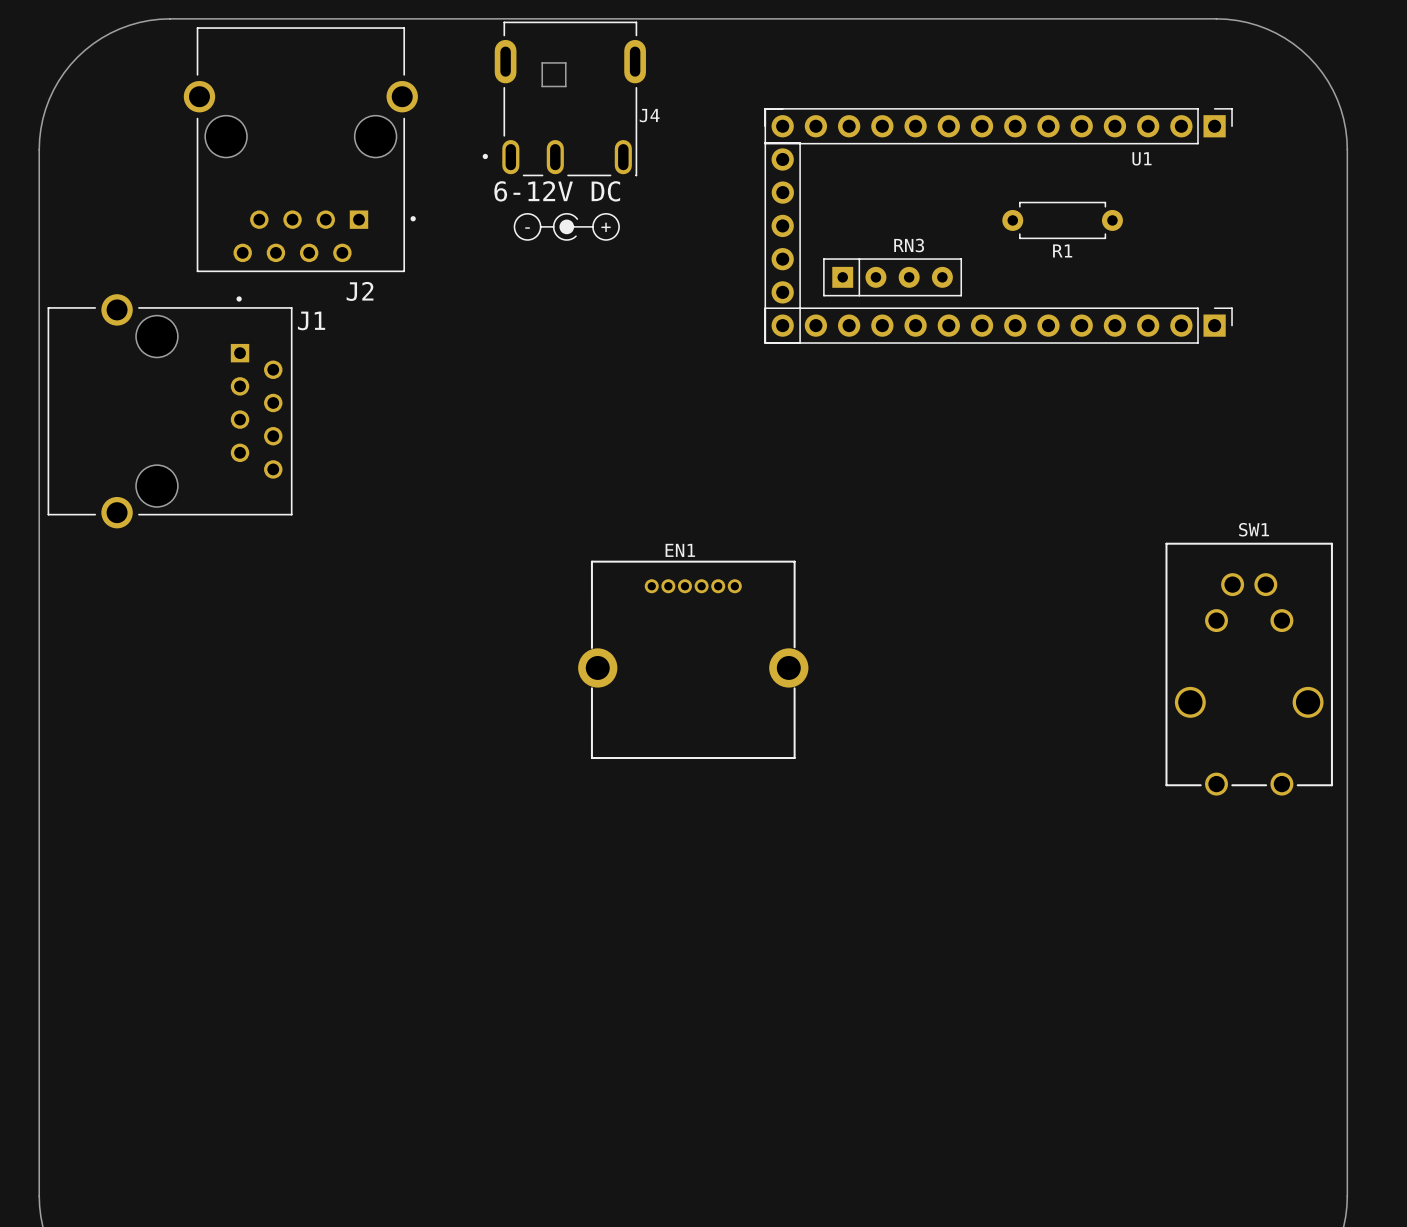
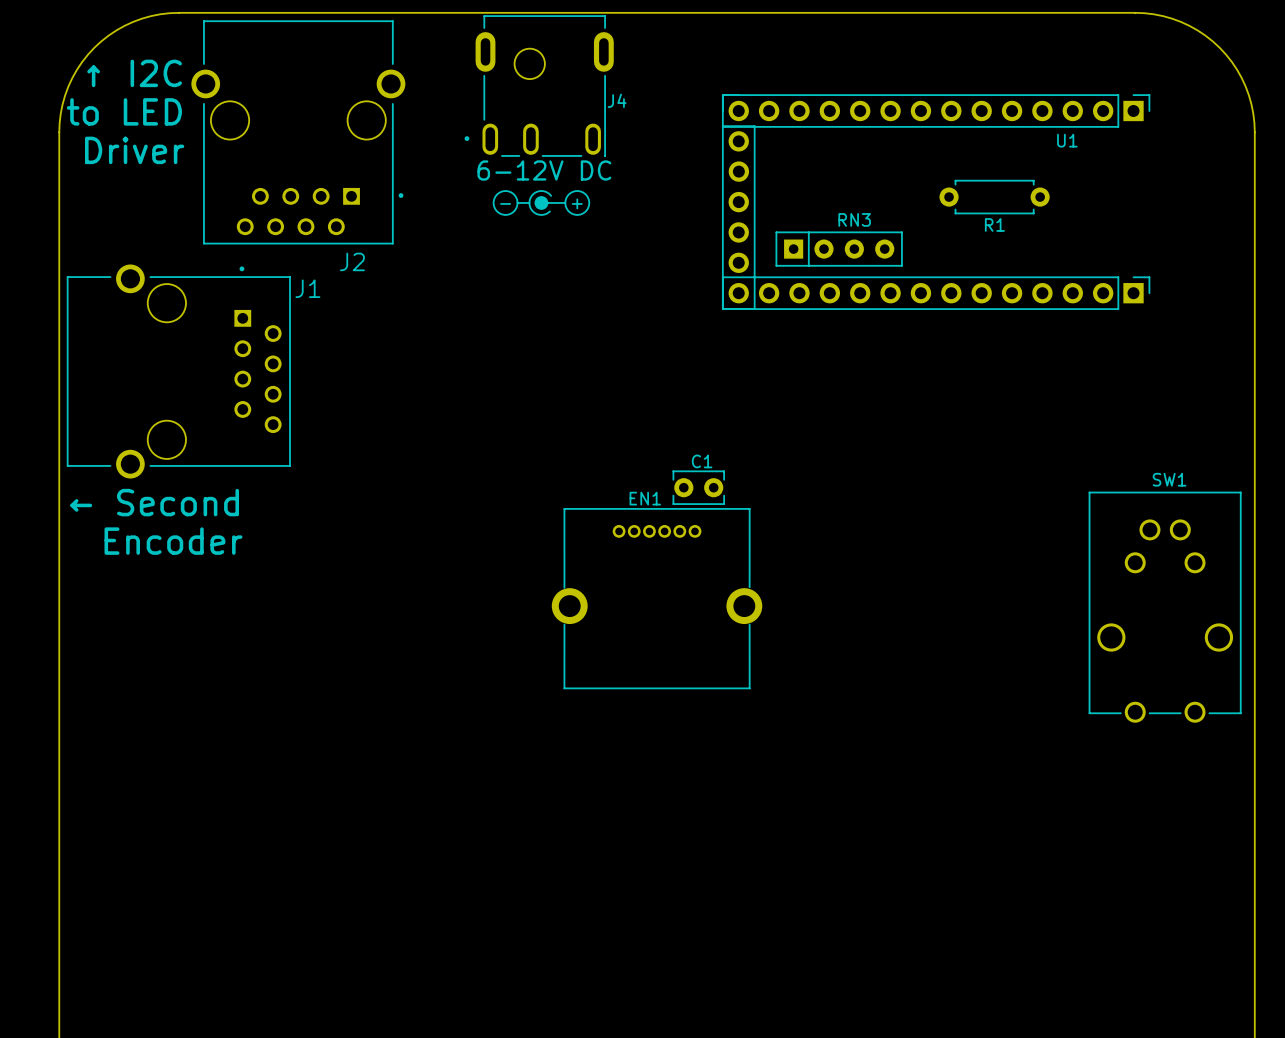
J4 footprint: [482, 21, 646, 177] -> [464, 15, 614, 157]
text: none -> ↑ I2C (134, 73)
text: none -> to LED (124, 111)
text: none -> Driver (134, 150)
C1: none -> (698, 487)
text: none -> ← Second (154, 502)
text: none -> Encoder (173, 541)

